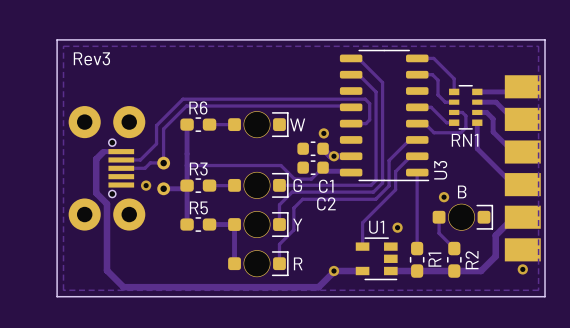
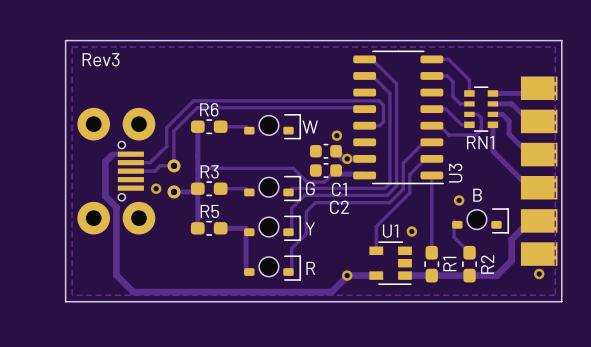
part footprint: [228, 111, 289, 139] -> [244, 114, 302, 140]
part footprint: [228, 171, 289, 199] -> [244, 175, 302, 202]
part footprint: [432, 203, 494, 231] -> [452, 208, 510, 234]
part footprint: [228, 211, 289, 239] -> [244, 215, 302, 241]
part footprint: [228, 250, 289, 278] -> [244, 255, 302, 281]

